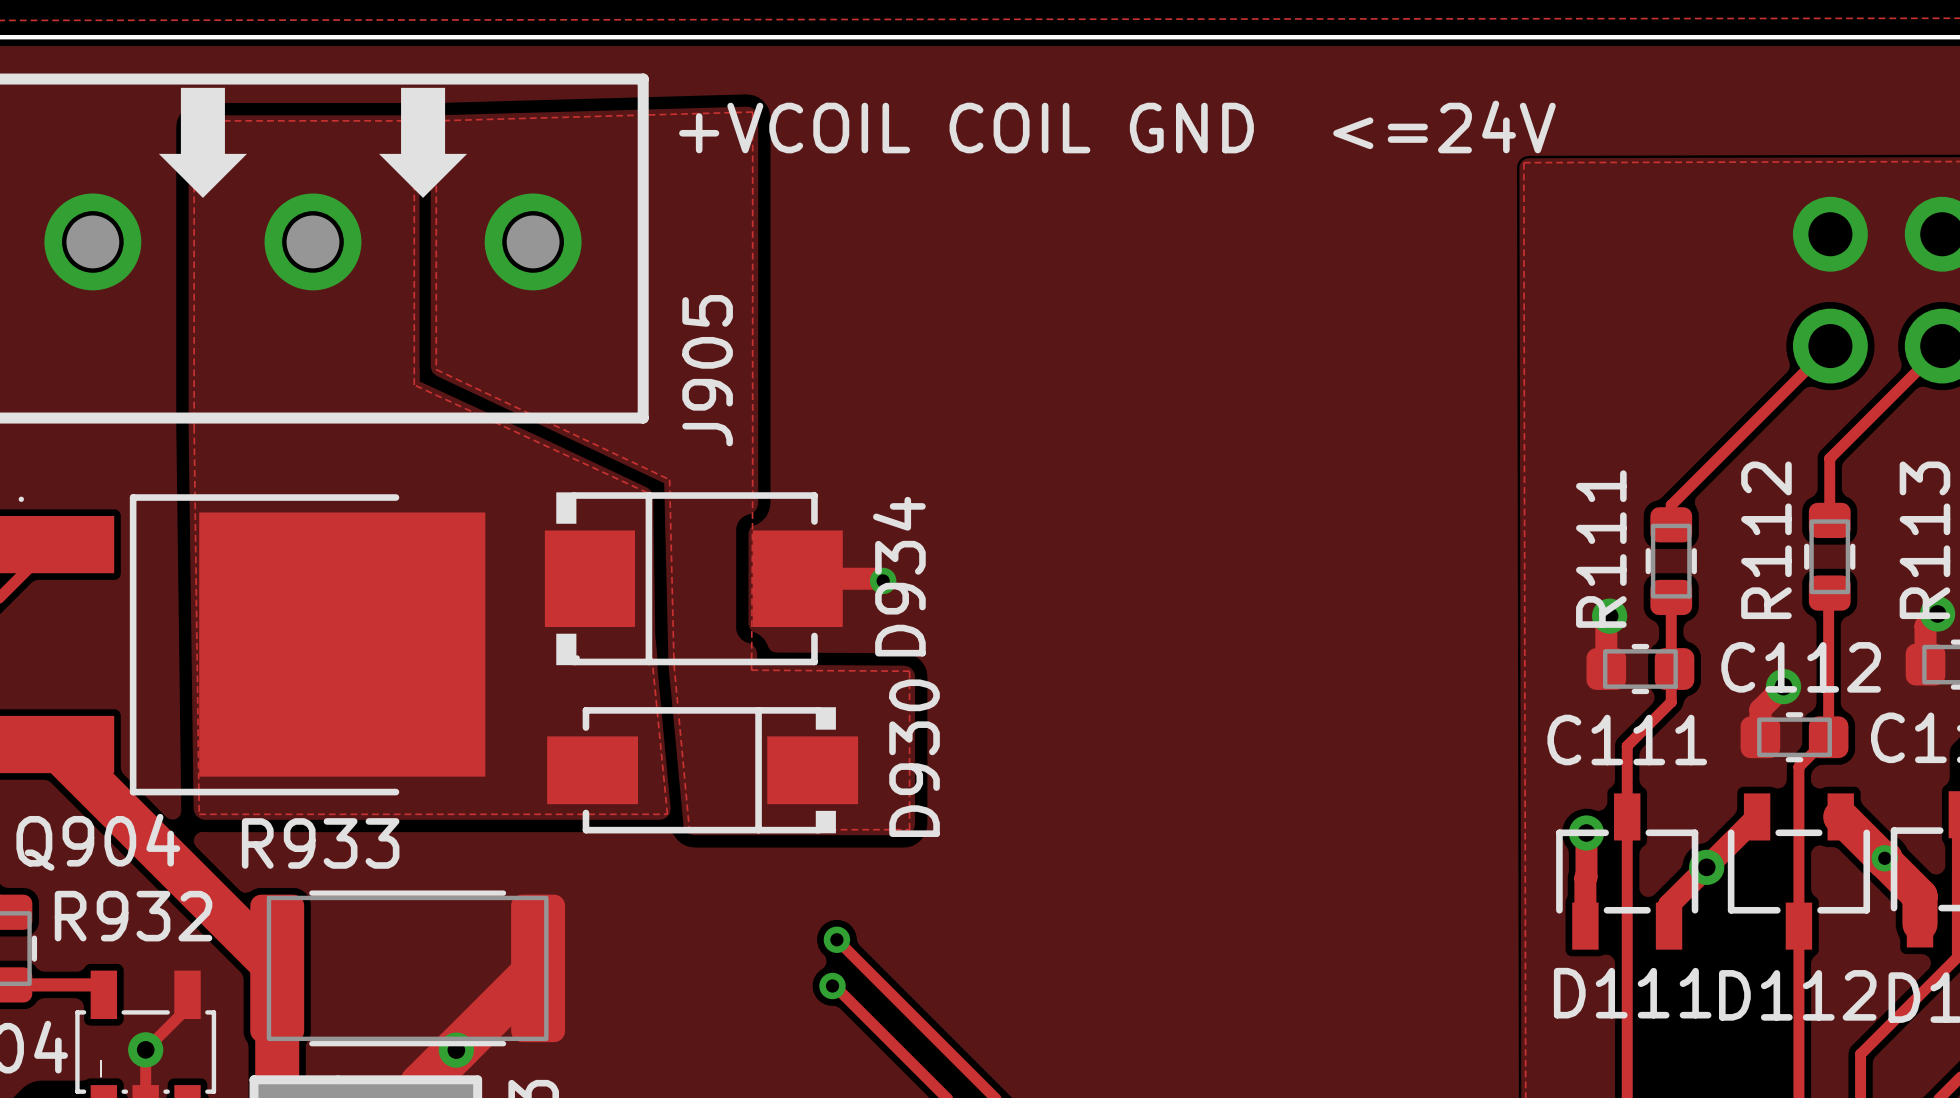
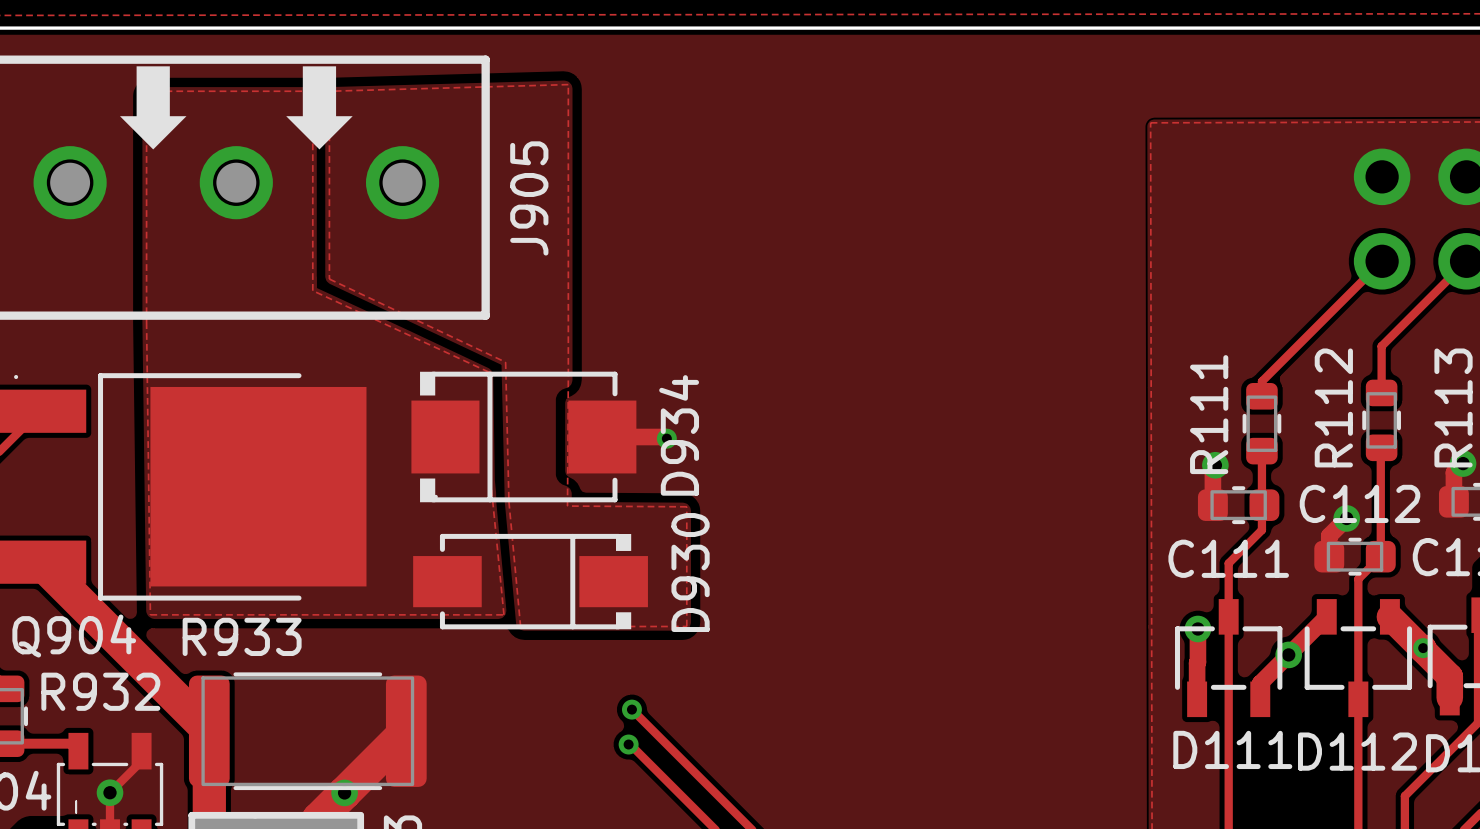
text: +VCOIL COIL GND <=24V (1117, 126) -> none
J905 name position: J905 (707, 370) -> J905 (529, 198)

